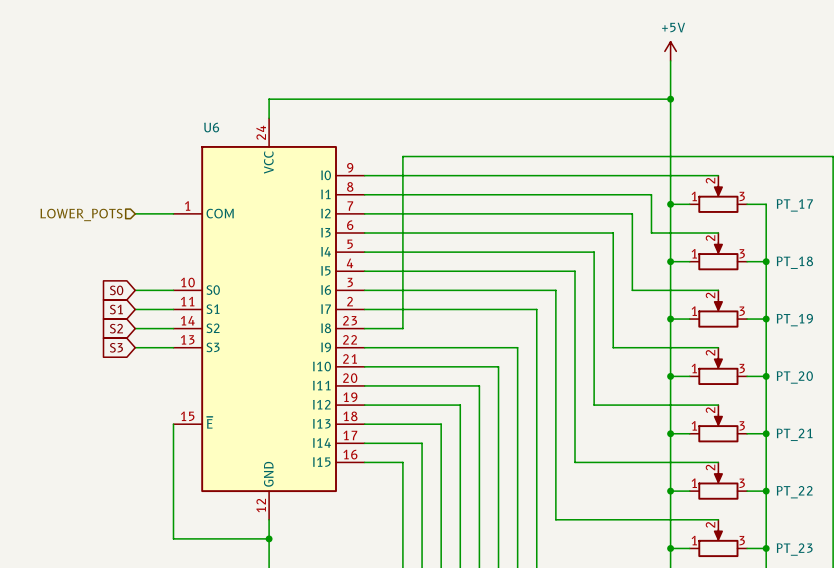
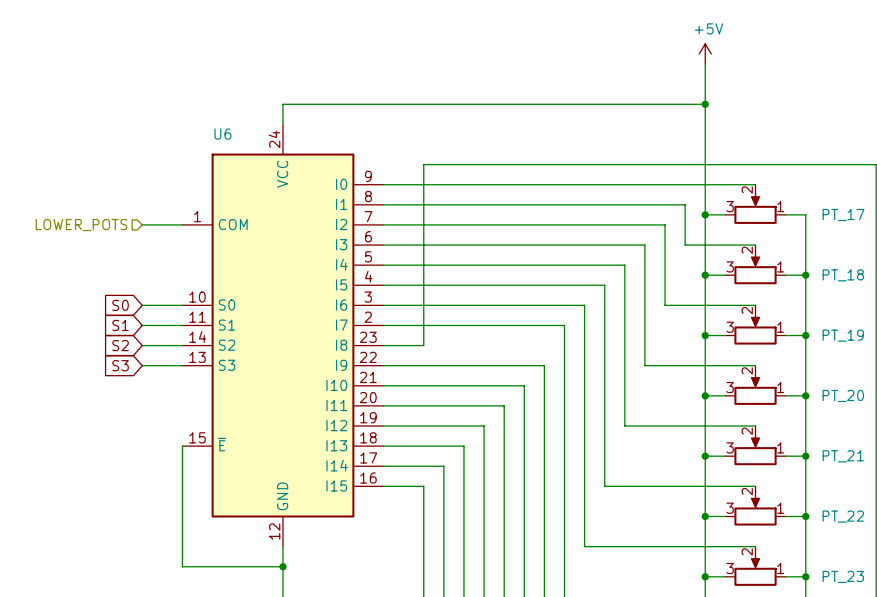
PT_17 flip: as is (718, 199) -> left-right (755, 209)
PT_18 flip: as is (718, 256) -> left-right (755, 269)
PT_19 flip: as is (718, 313) -> left-right (755, 329)
PT_20 flip: as is (718, 371) -> left-right (755, 390)
PT_21 flip: as is (718, 428) -> left-right (755, 450)
PT_22 flip: as is (718, 485) -> left-right (755, 510)
PT_23 flip: as is (718, 543) -> left-right (755, 571)

